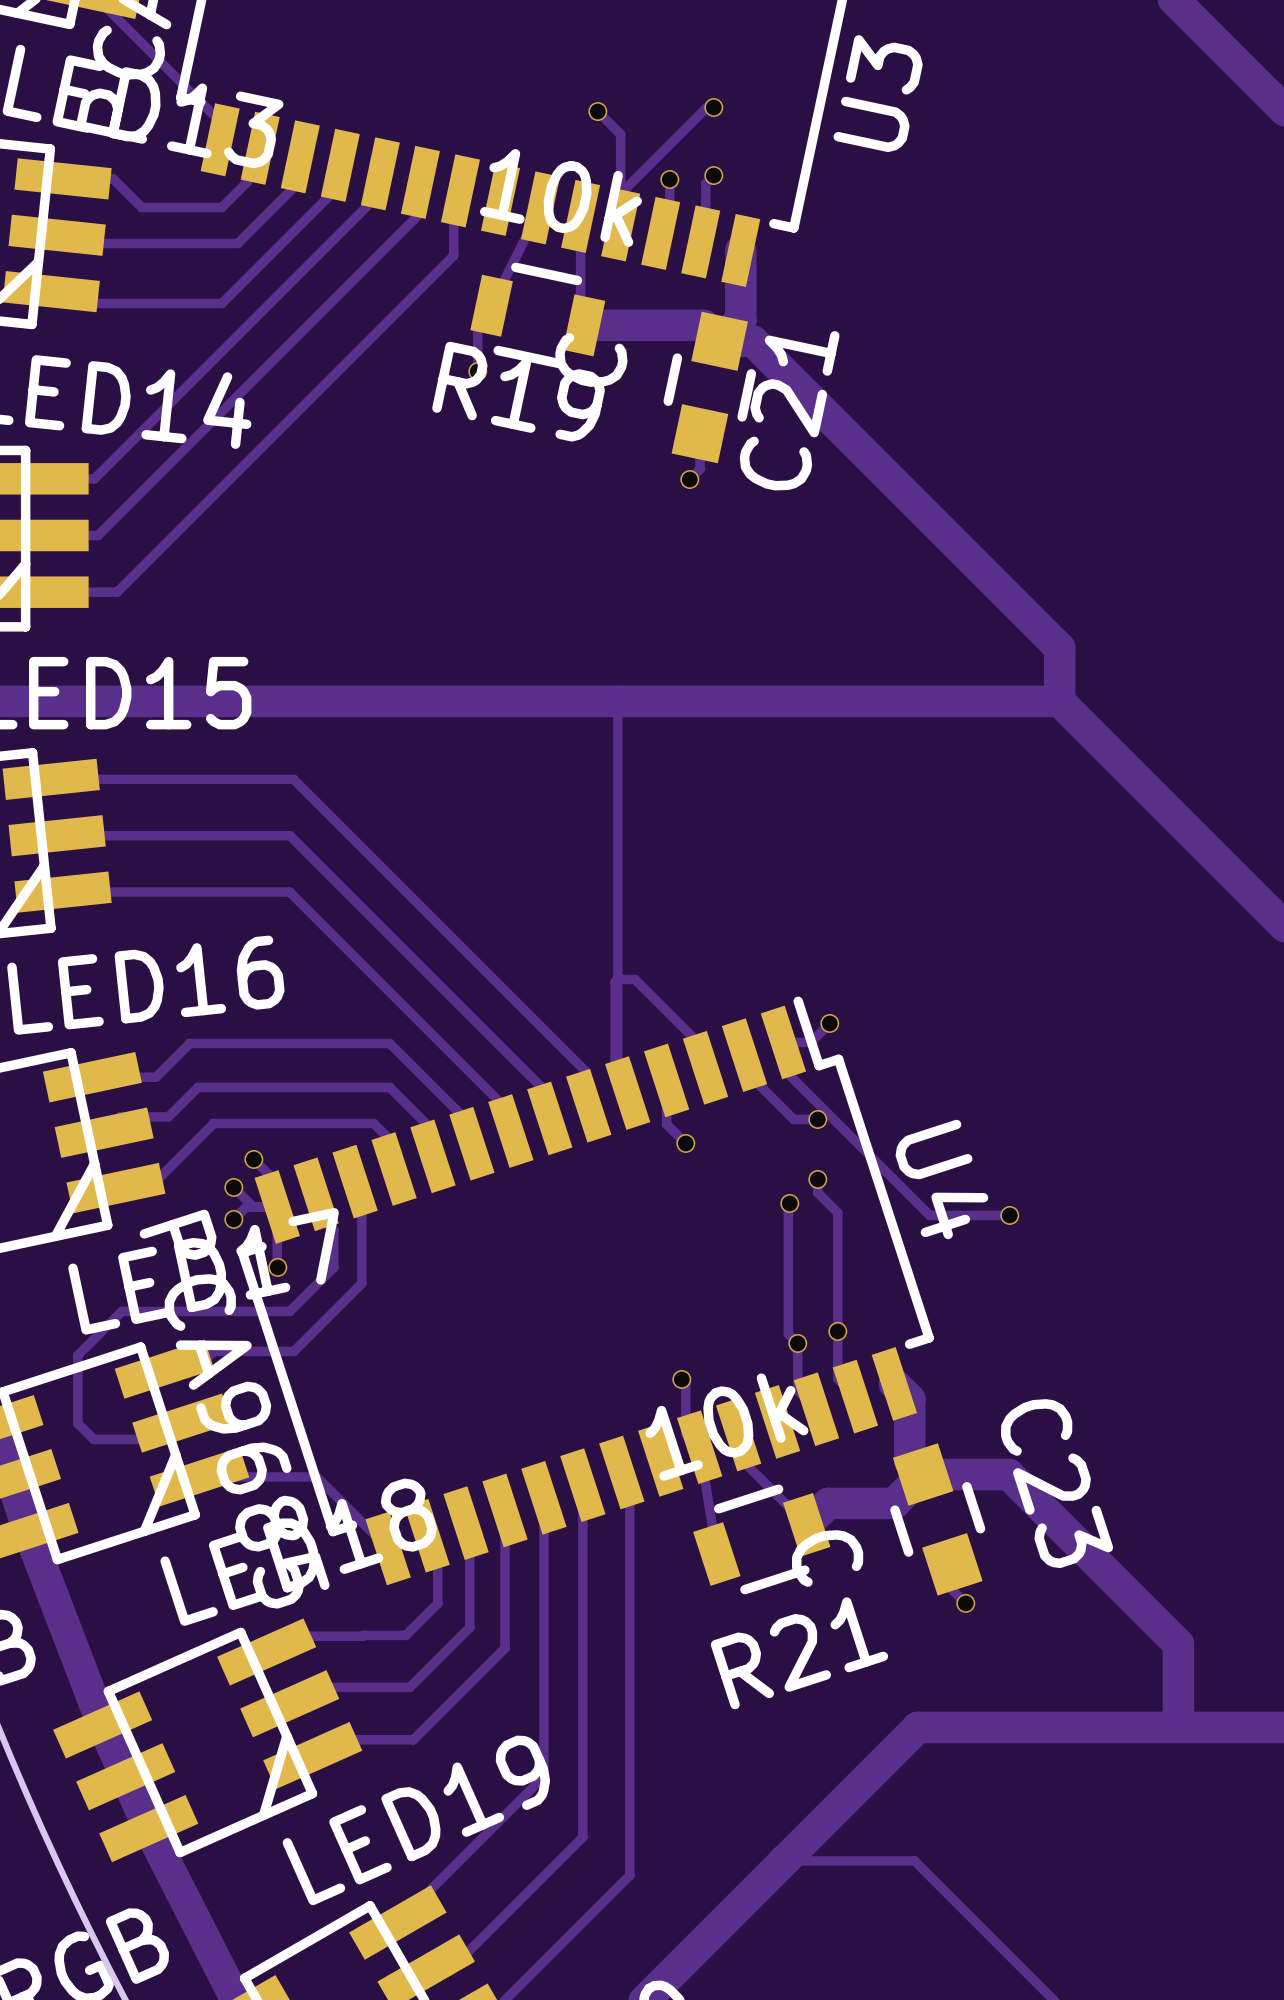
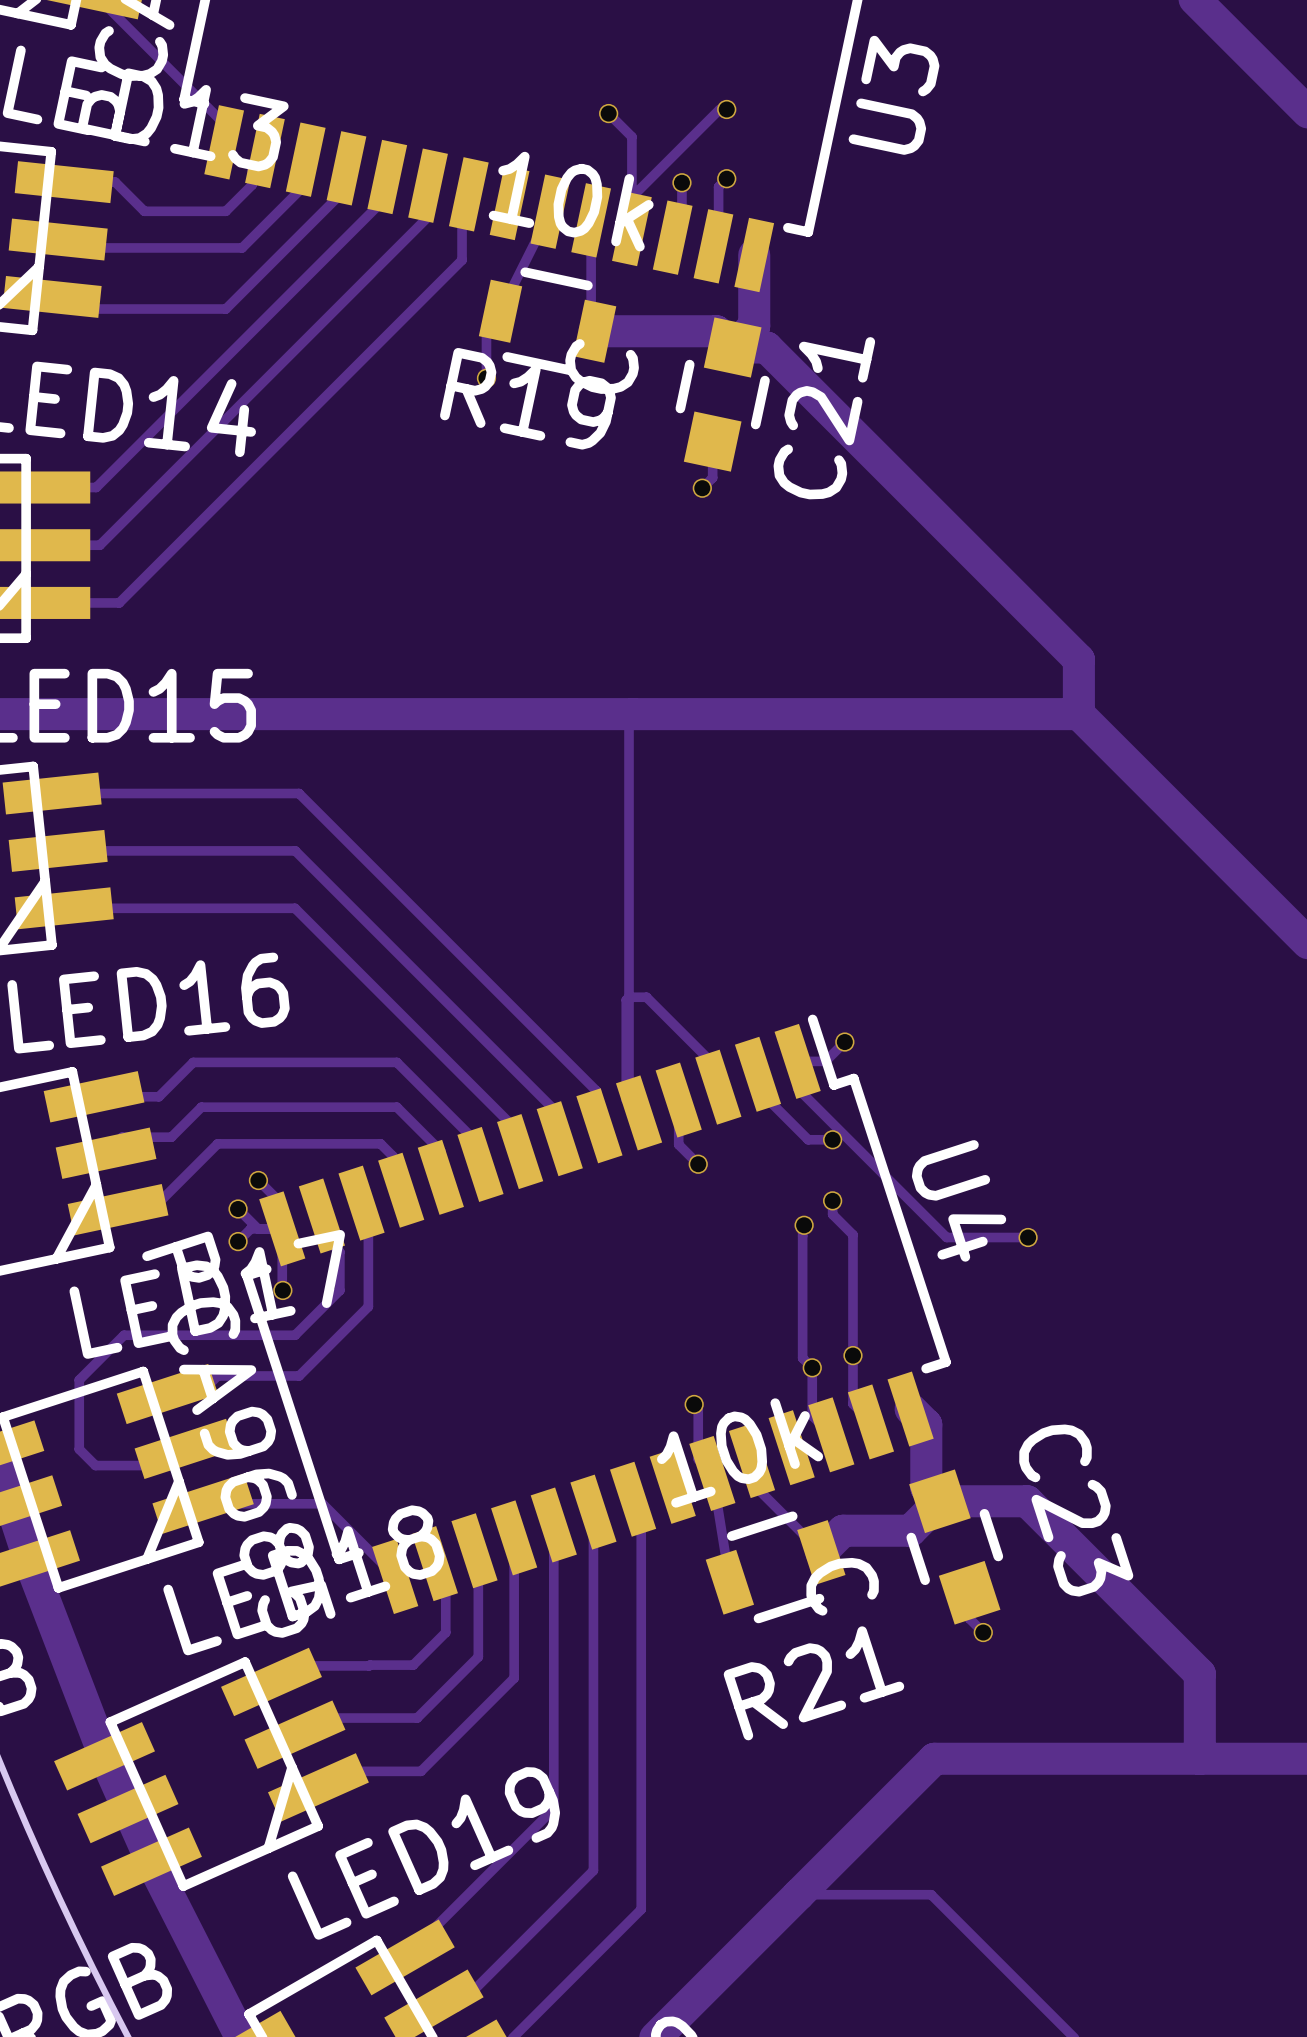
C21 name position: C21 (789, 410) -> C21 (824, 418)

